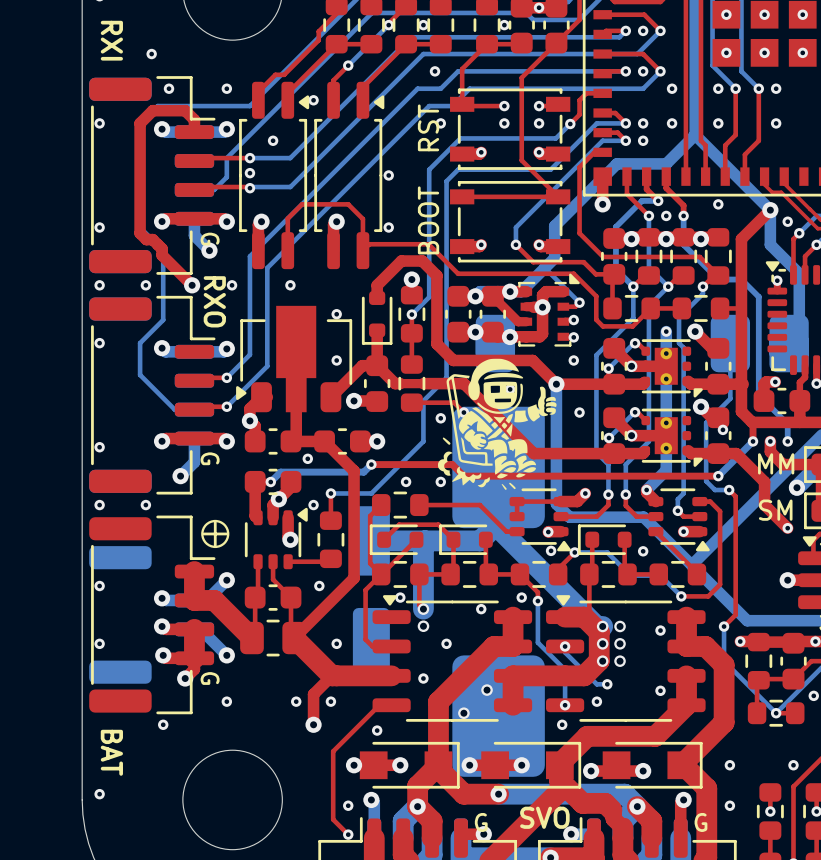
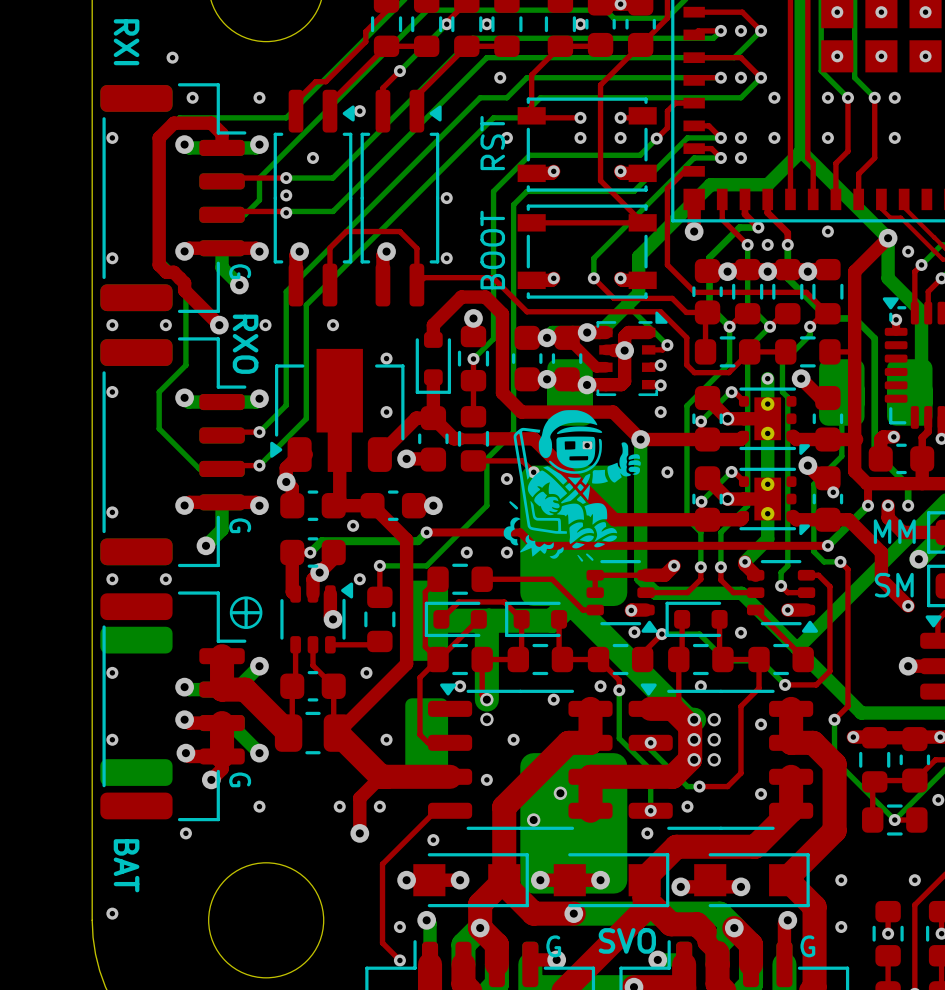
top track: none -> (759, 659) (759, 688) (740, 706) (740, 773) (727, 786) (699, 786)
via: none -> (700, 686)

